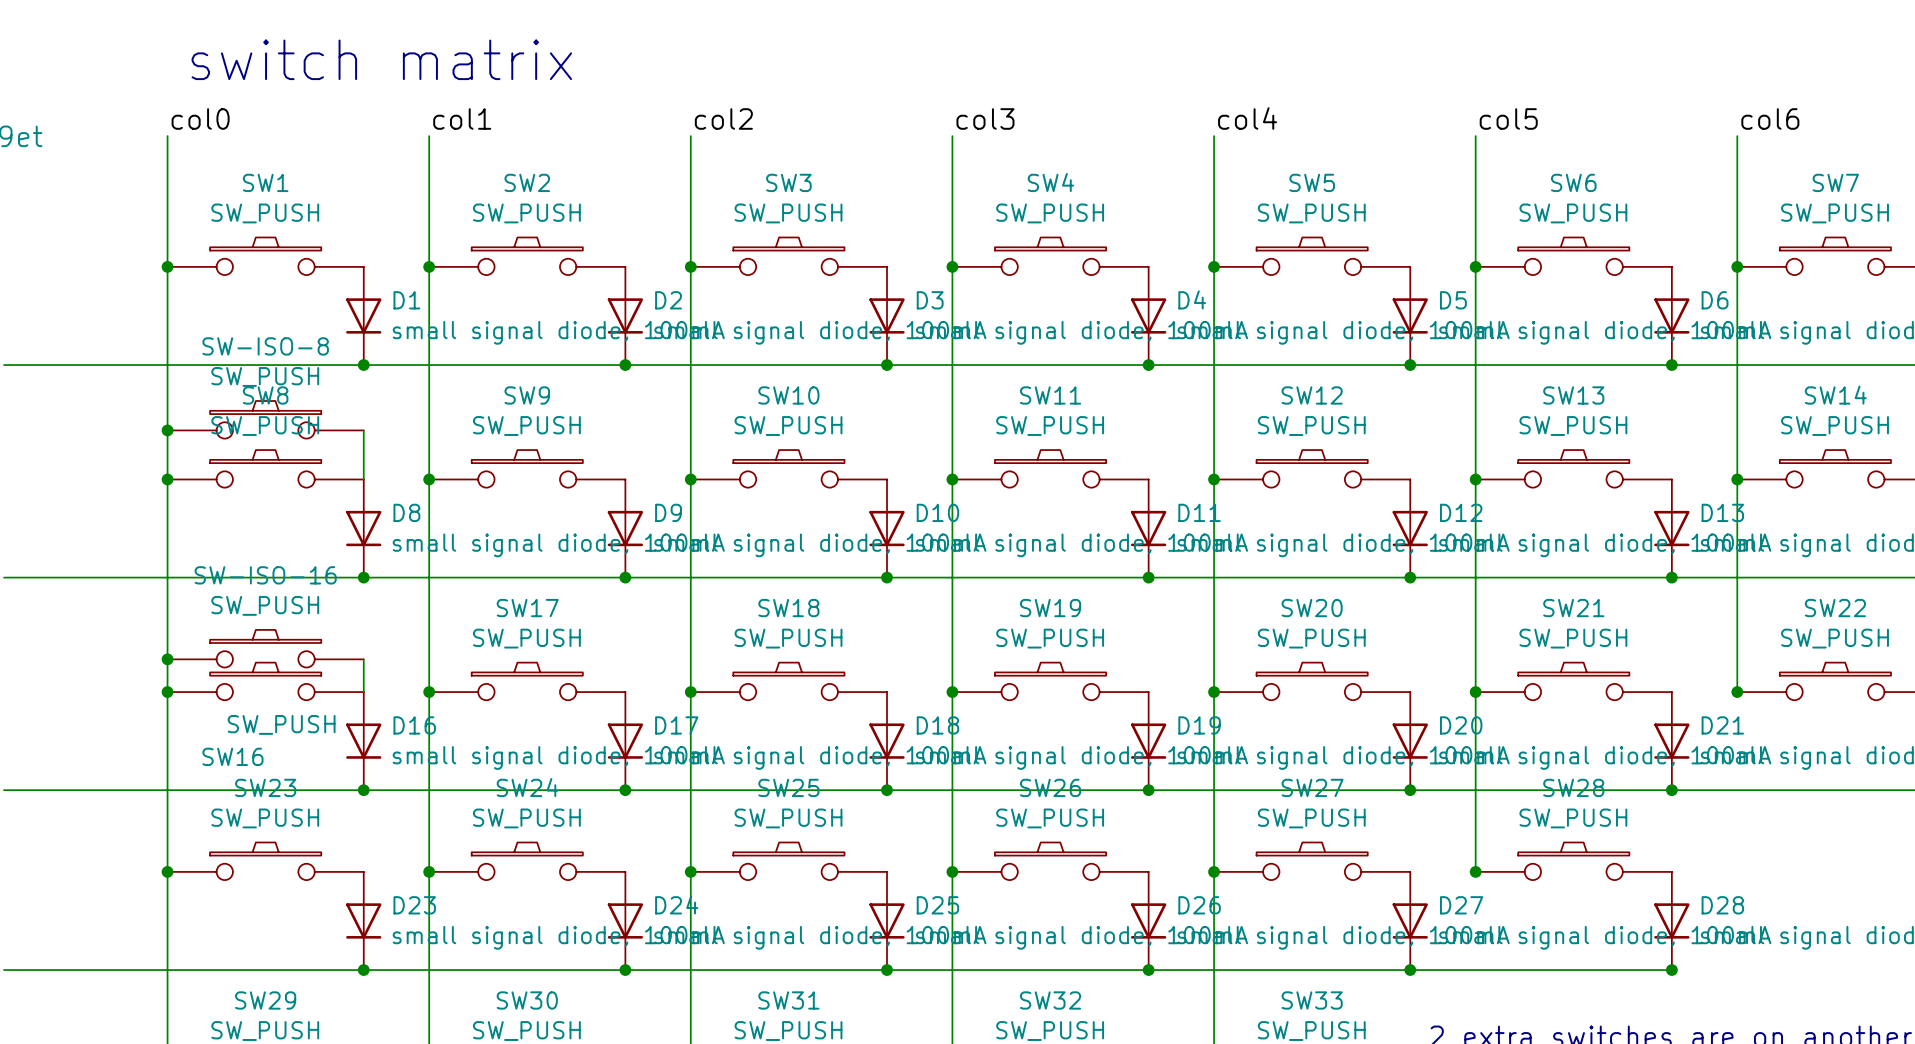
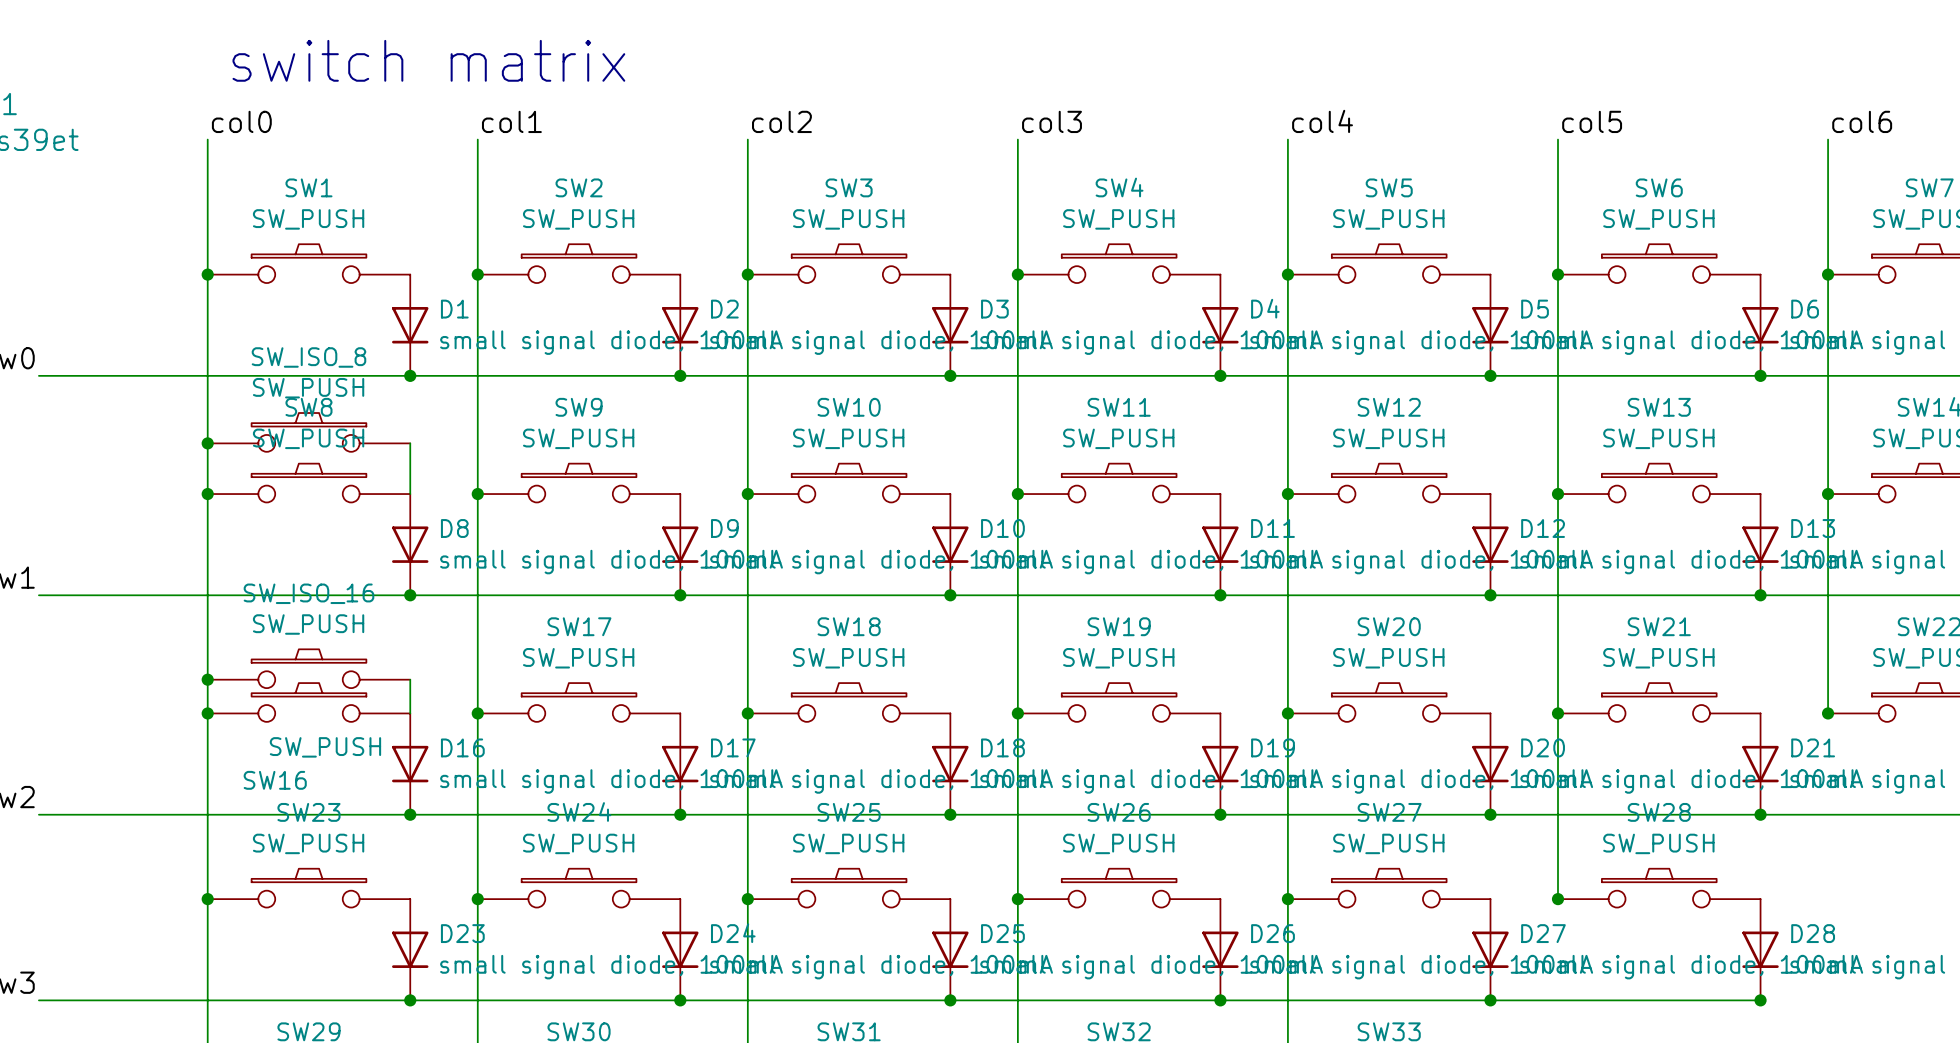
SW-ISO-8 name: SW-ISO-8 (265, 346) -> SW_ISO_8 (308, 357)
SW-ISO-16 name: SW-ISO-16 (265, 575) -> SW_ISO_16 (308, 593)

